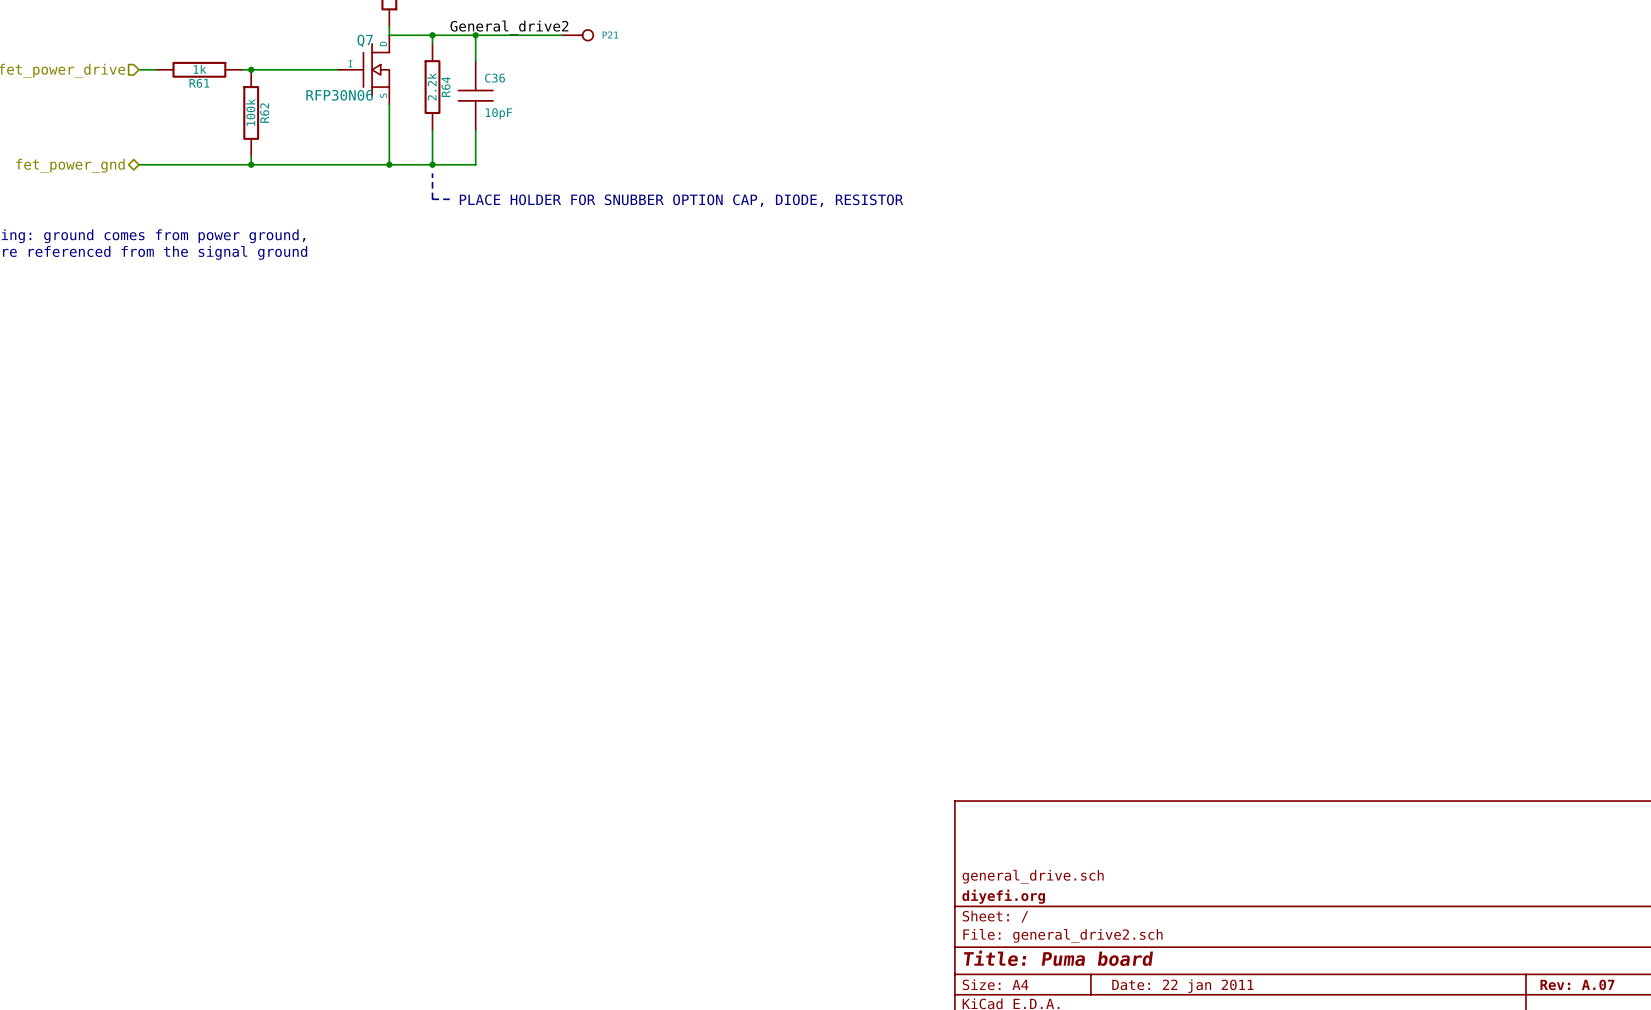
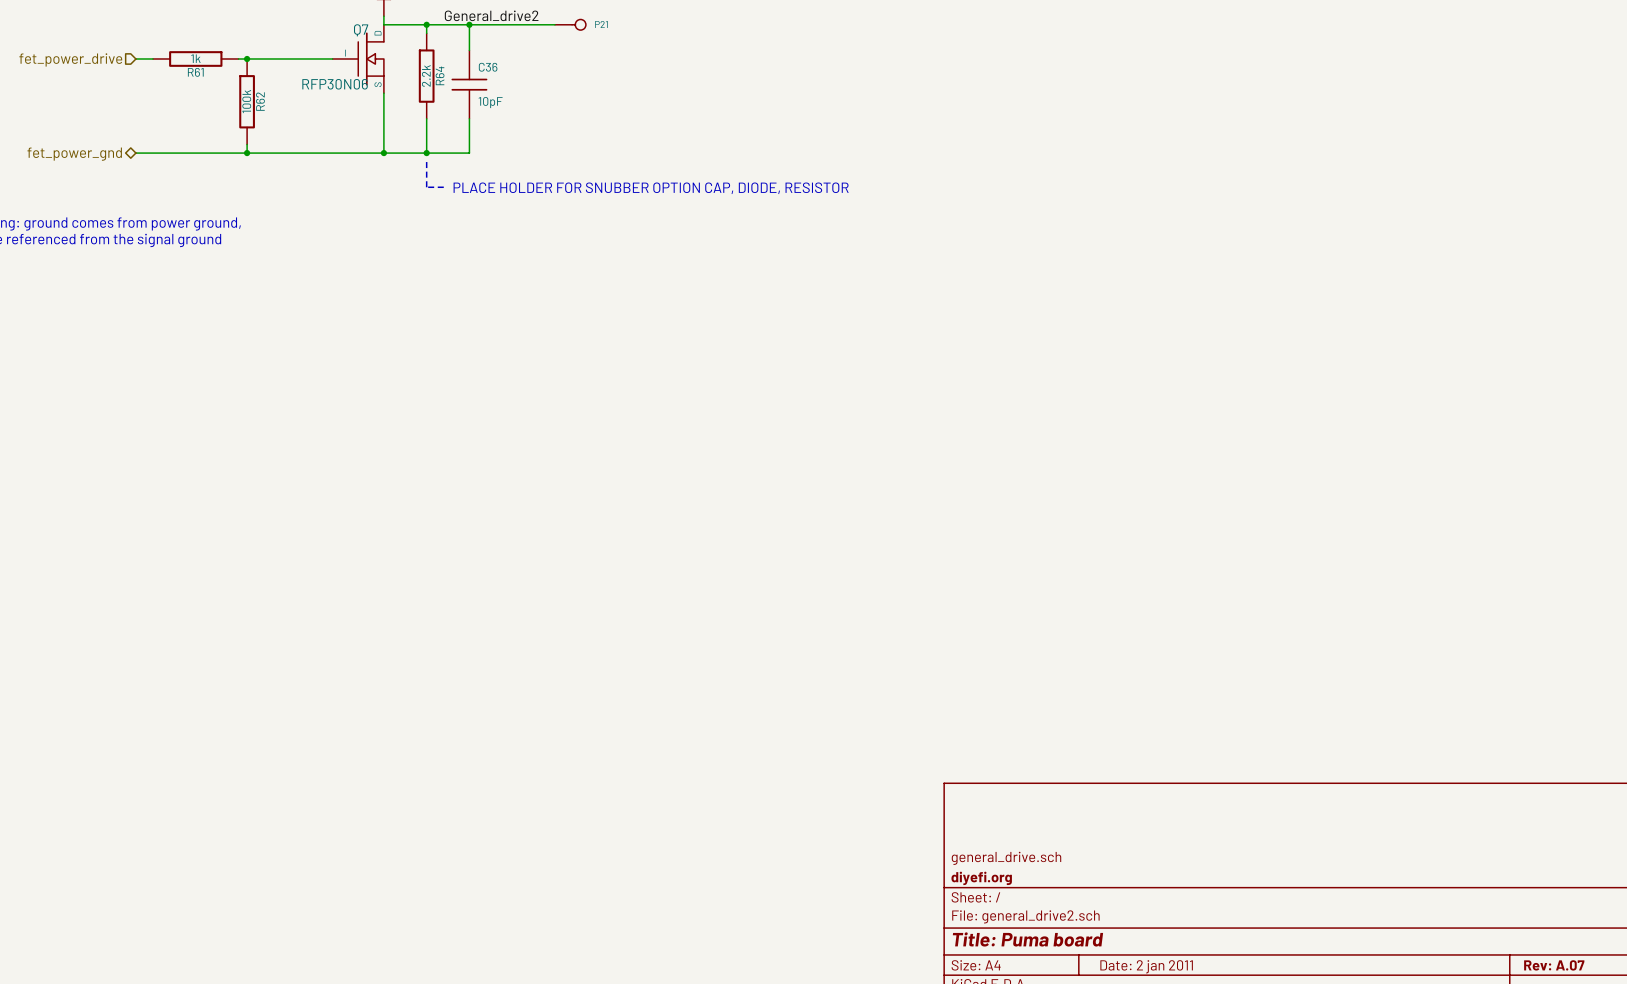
title block: Date: 22 jan 2011 (1182, 986) -> Date: 2 jan 2011 (1146, 966)

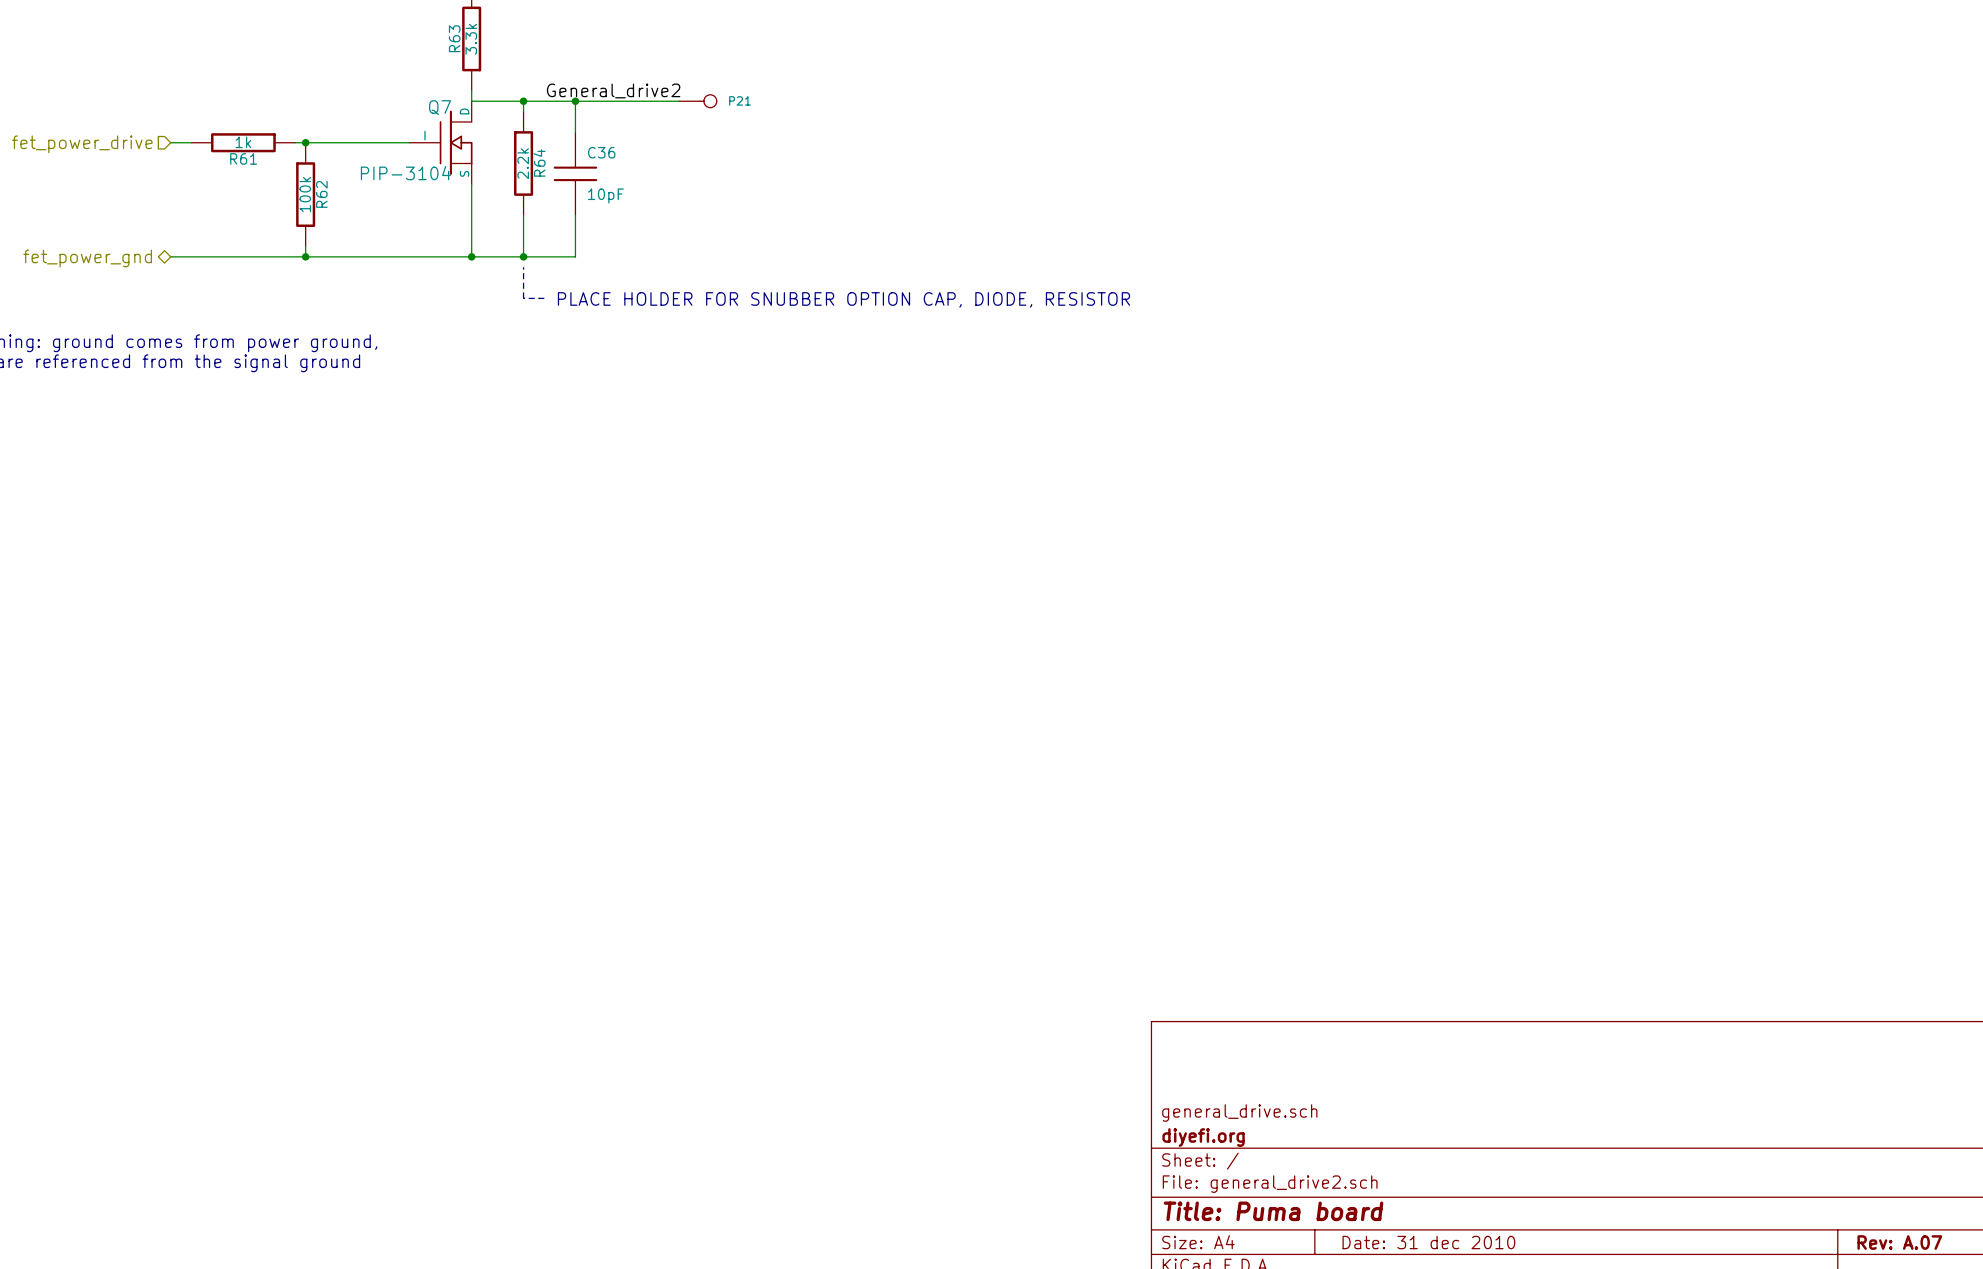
Q7 value: RFP30N06 (335, 84) -> PIP-3104 (405, 173)
title block: Date: 2 jan 2011 (1146, 966) -> Date: 31 dec 2010 (1428, 1242)

